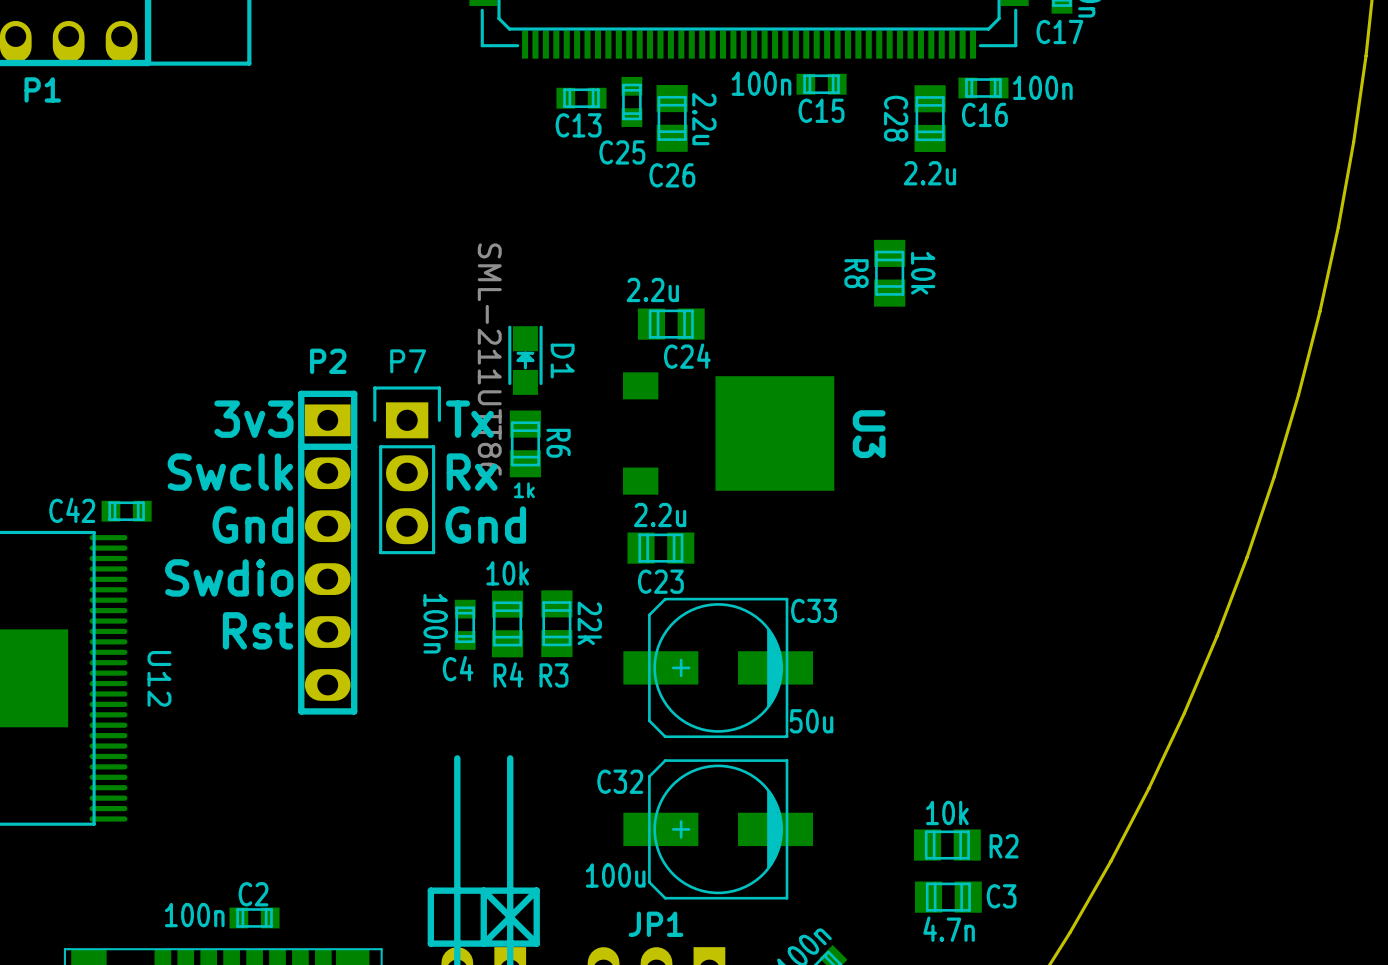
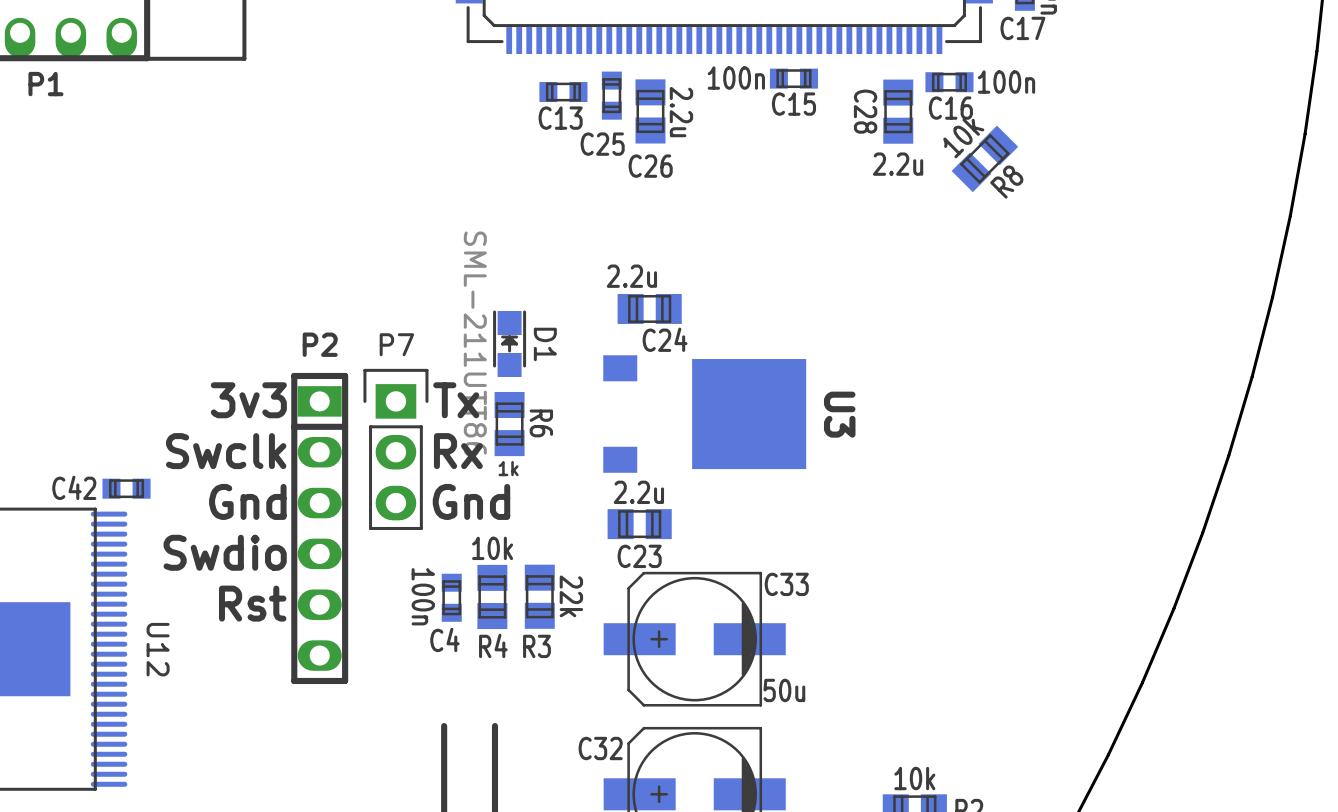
R8 rotation: 0° (889, 273) -> 135° counterclockwise (984, 158)
R8 position: (889, 273) -> (984, 158)

